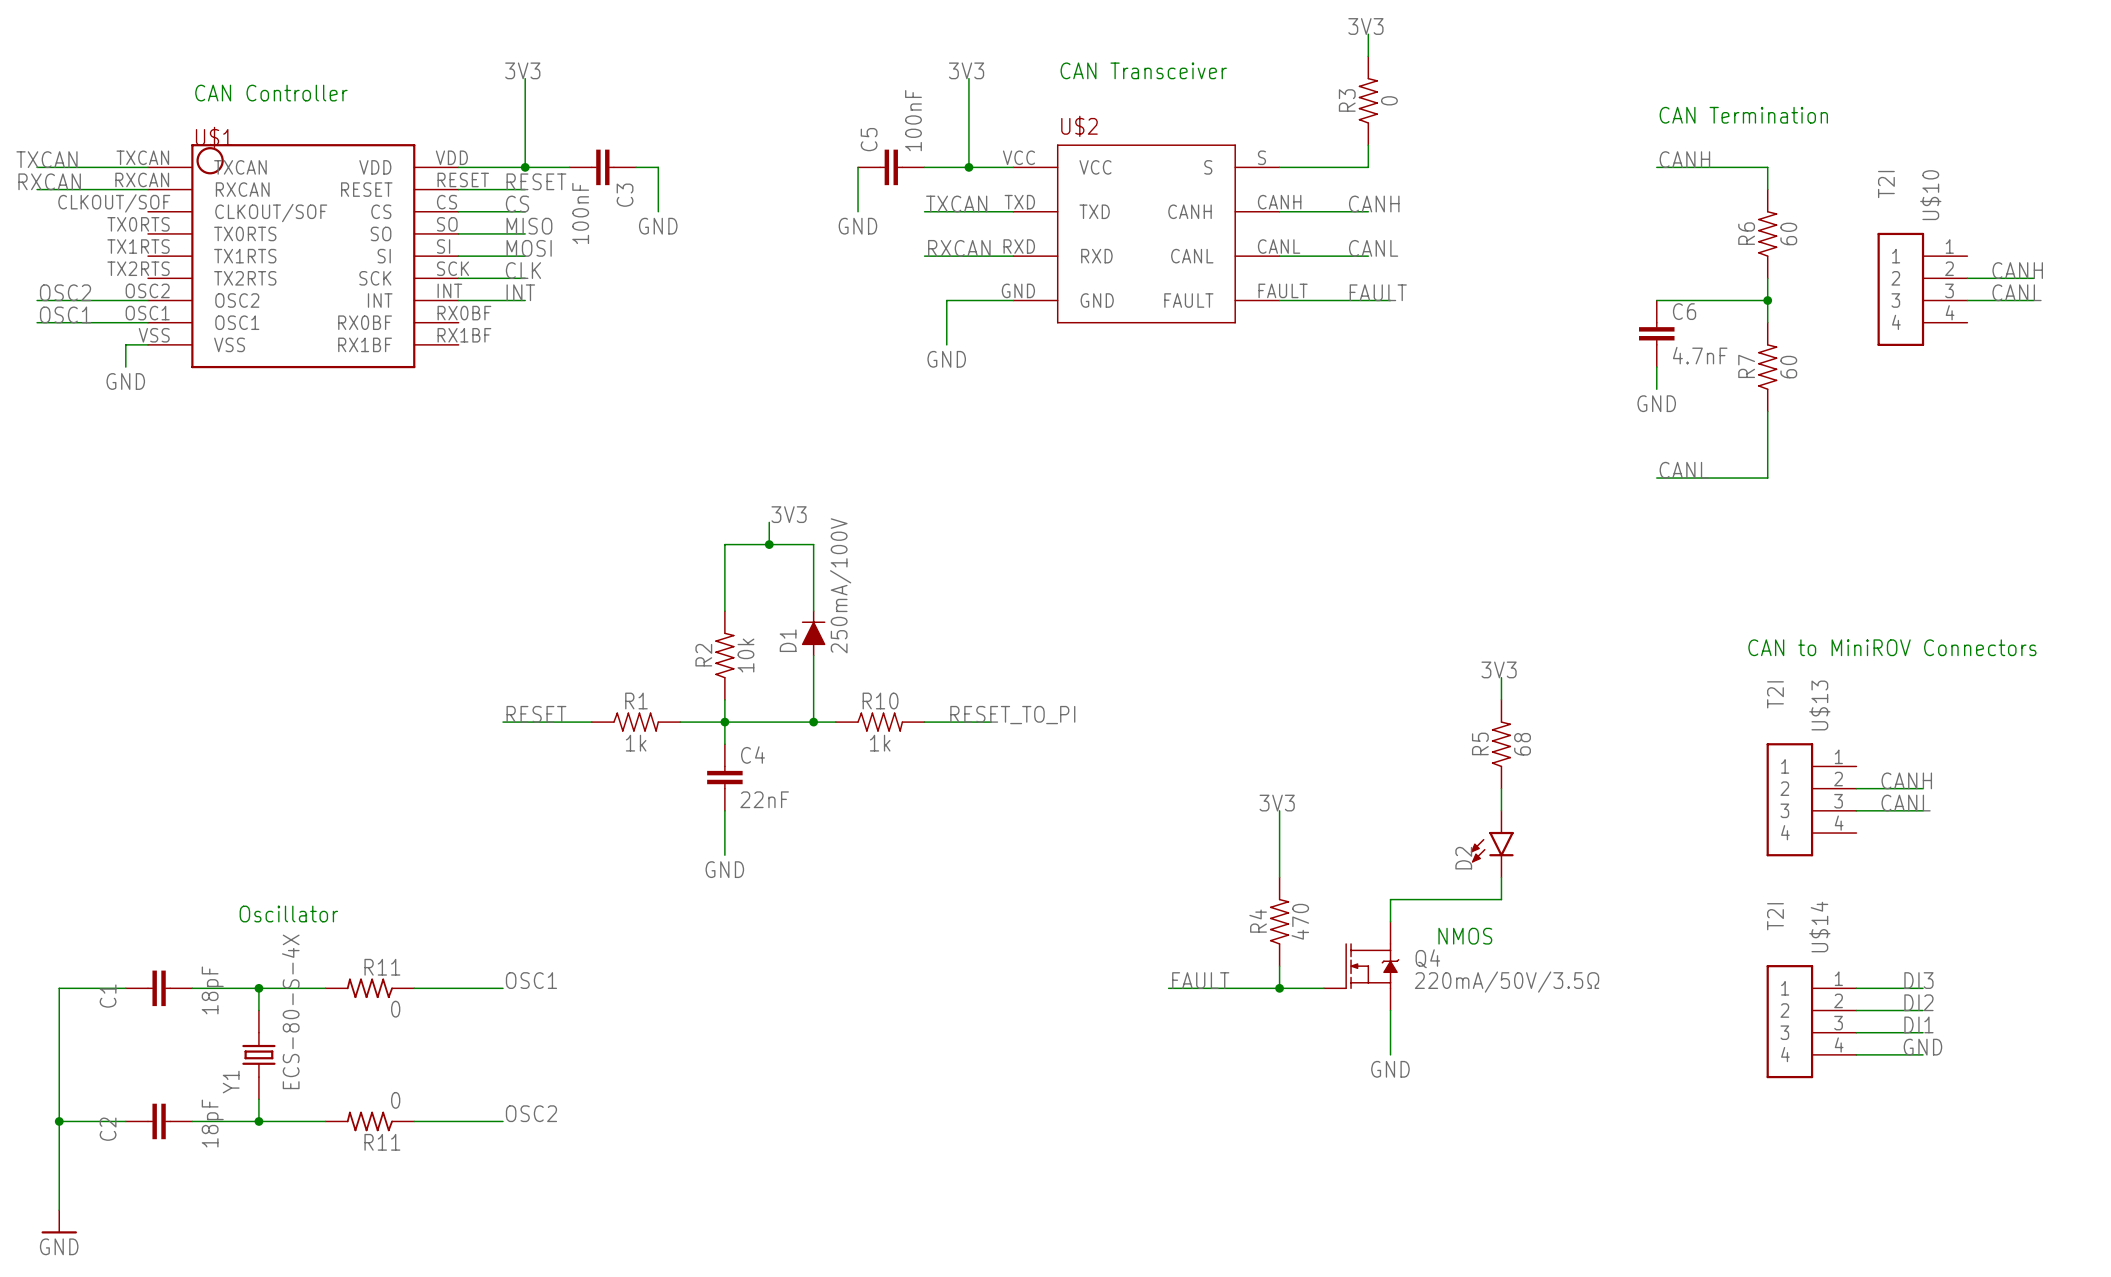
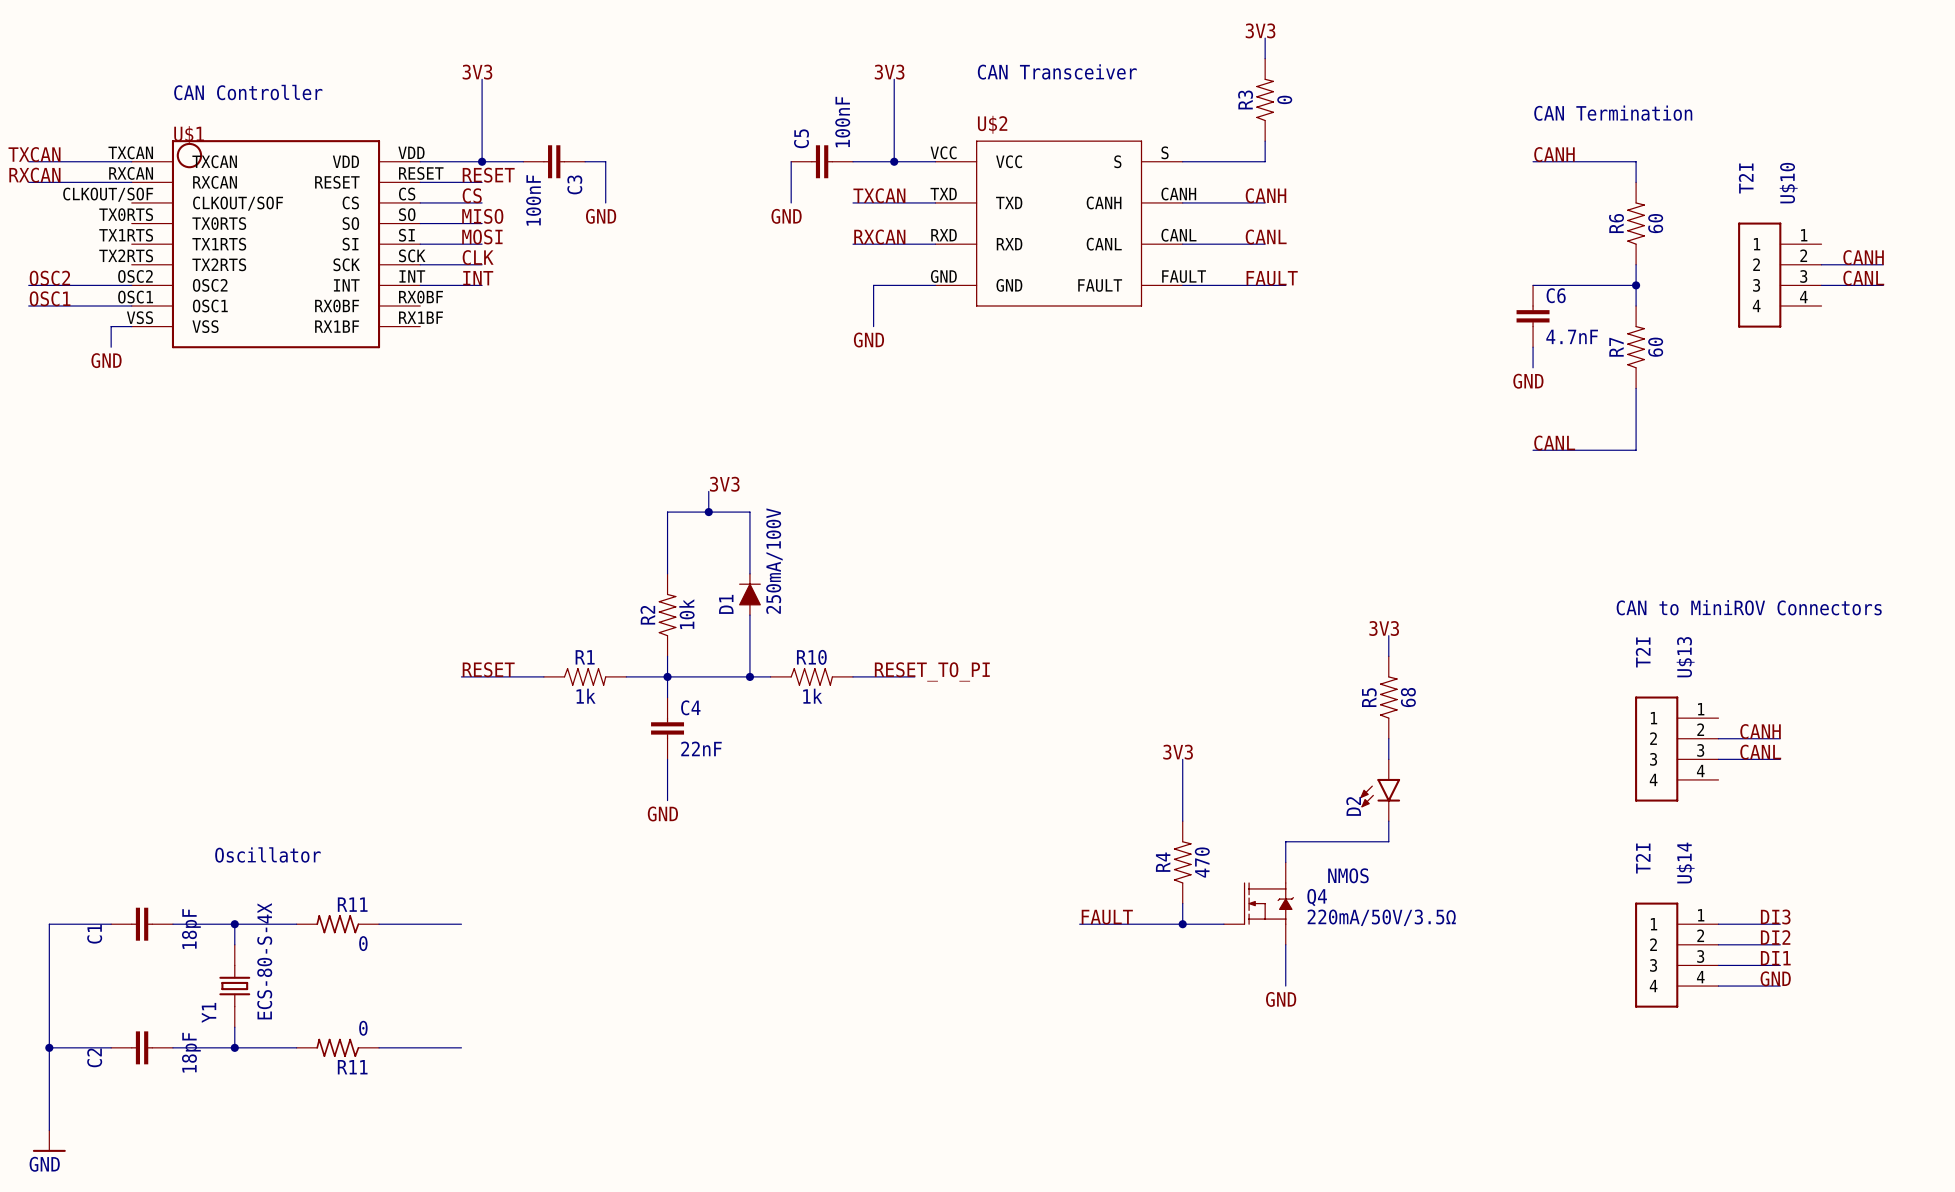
label: OSC1 (531, 980) -> none
label: OSC2 (531, 1113) -> none

